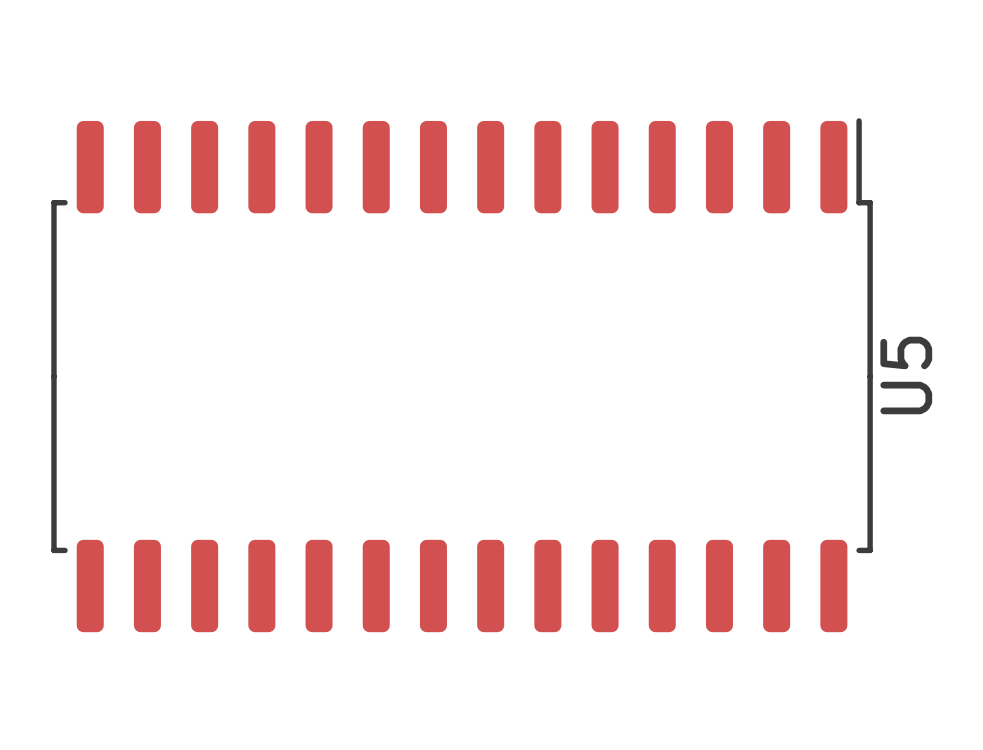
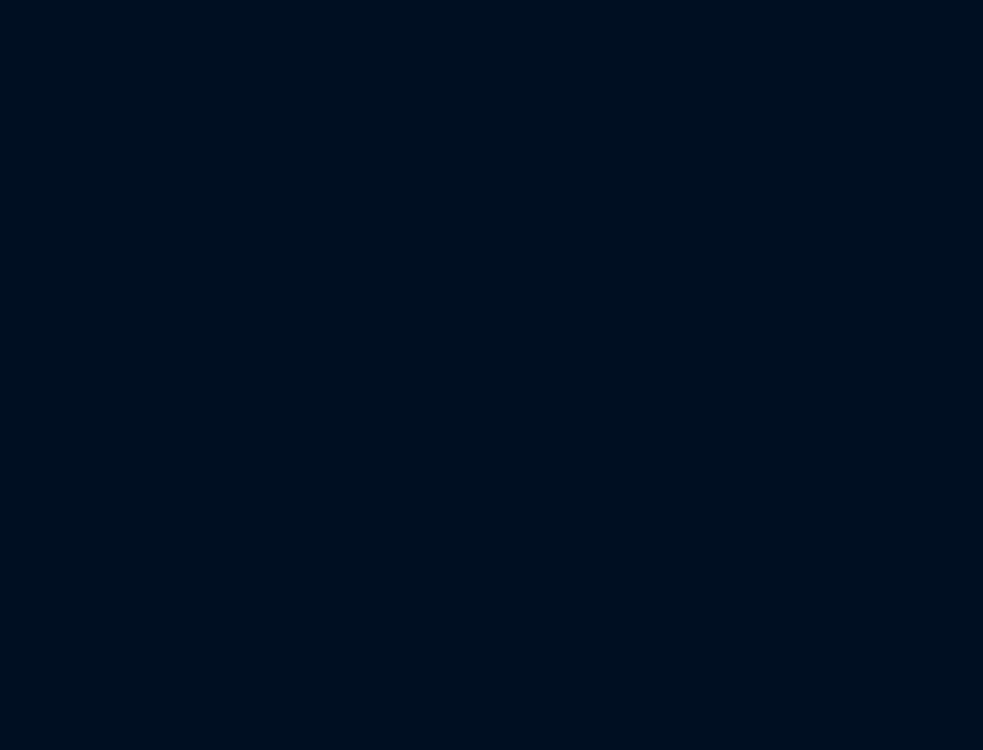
U5: (462, 375) -> none

